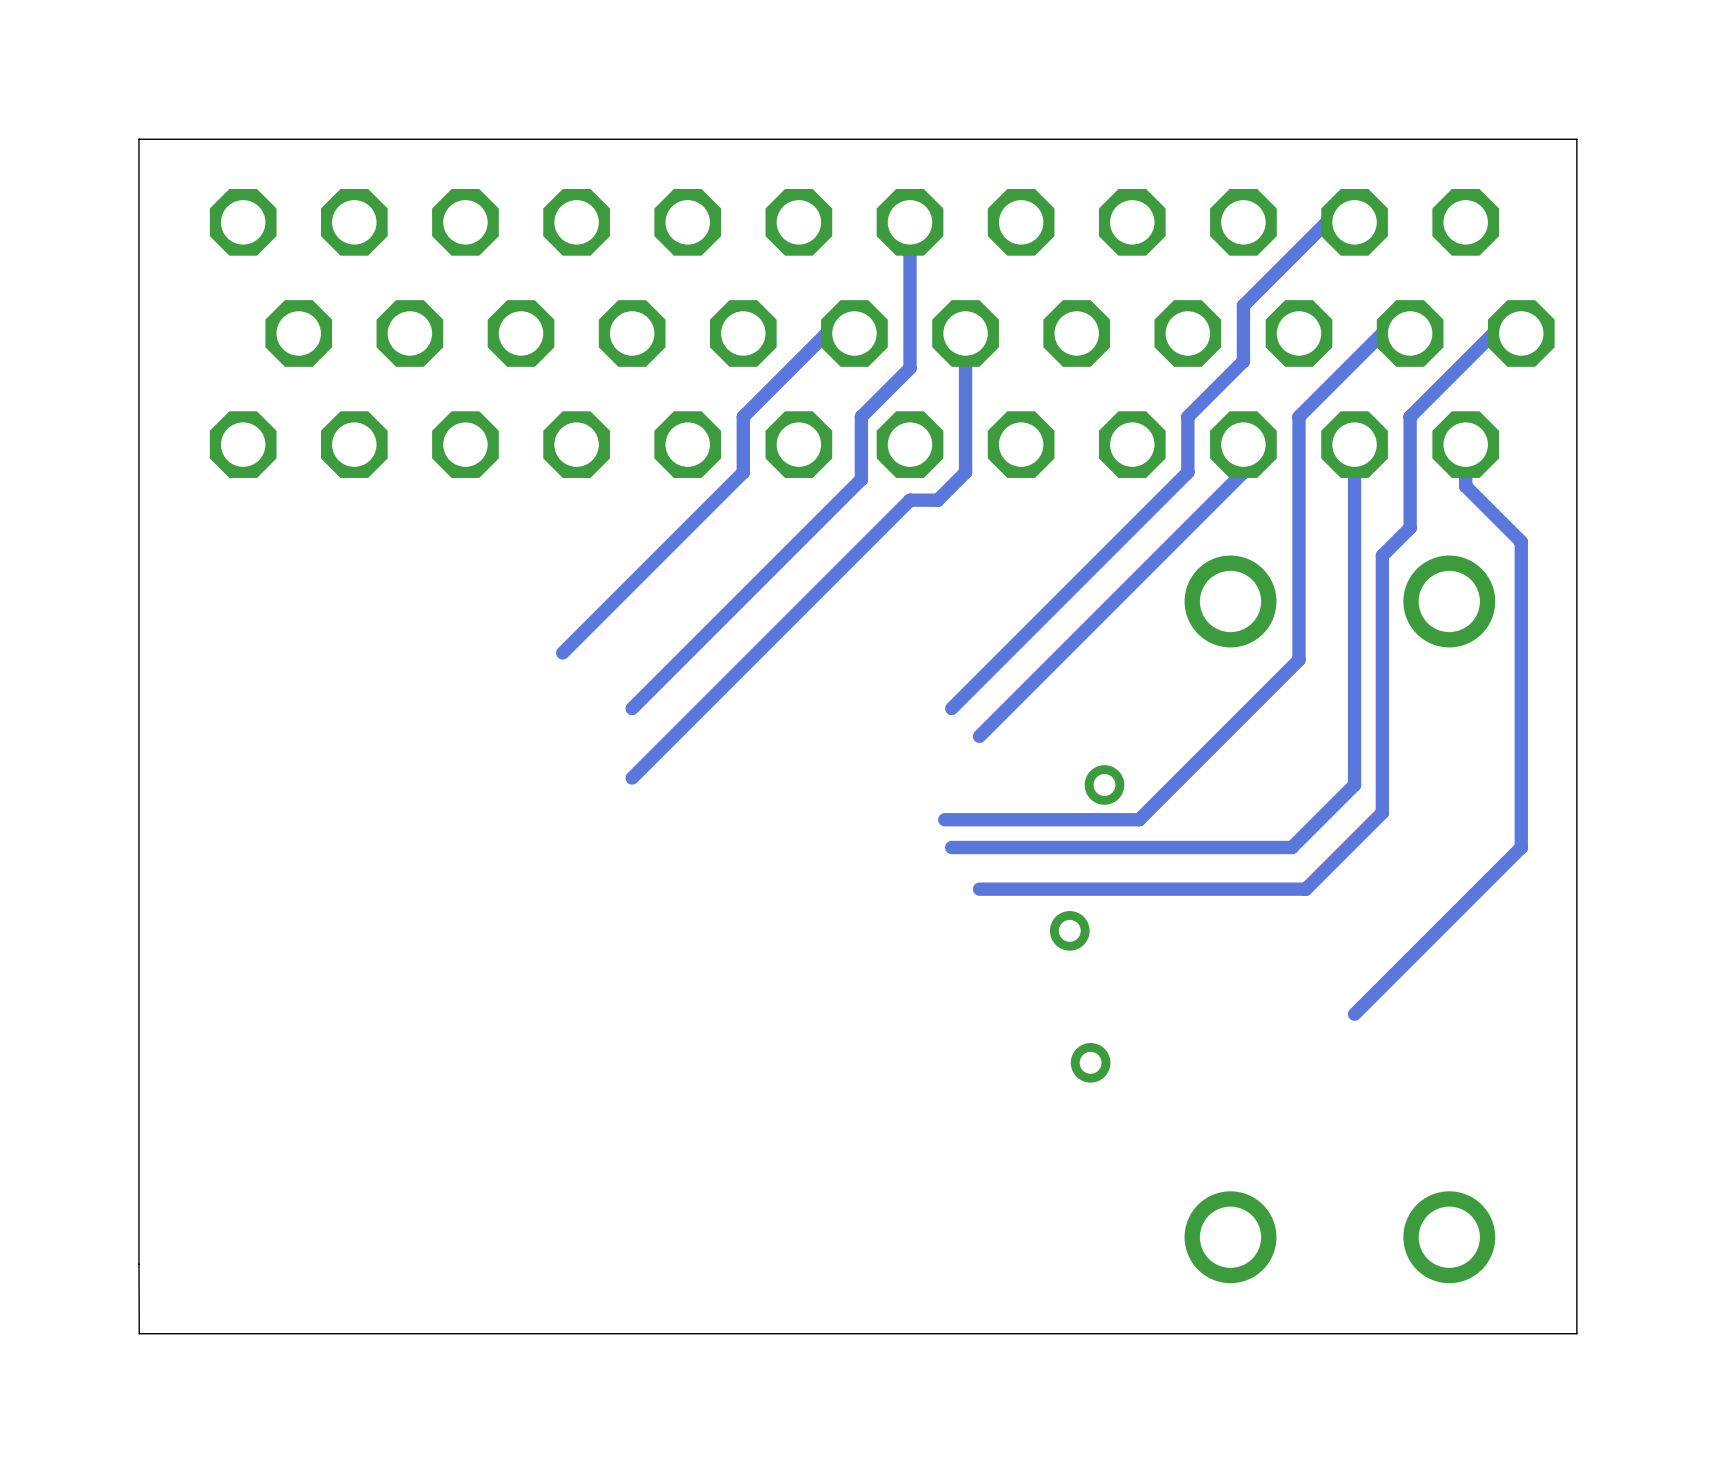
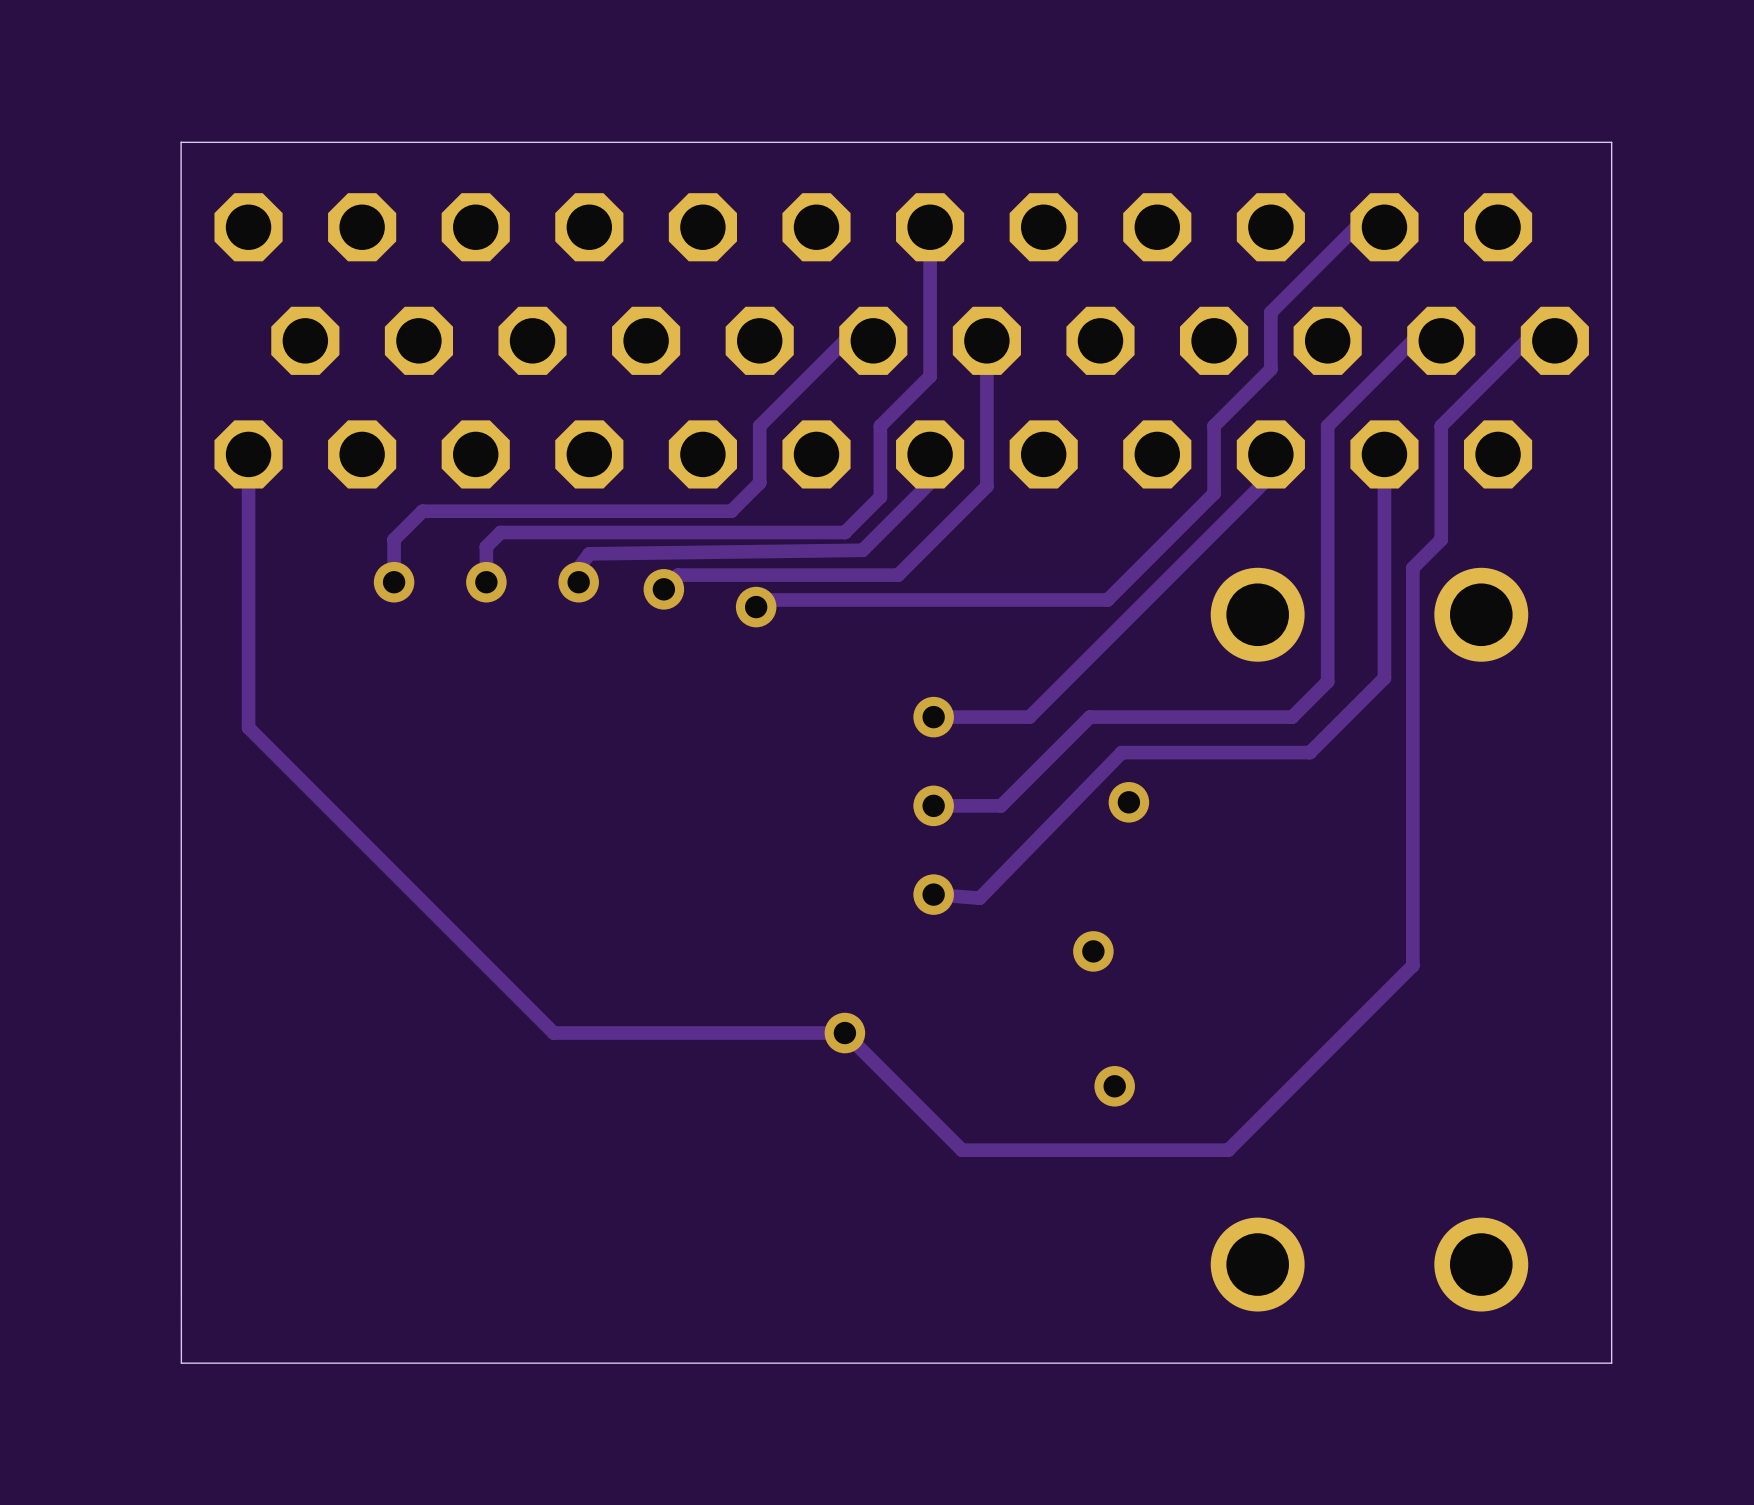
board edge: (138, 138) (139, 1333) (177, 1333) -> (181, 142) (181, 1363)
board edge: (177, 139) (139, 139) -> none
track: none -> (930, 454) (930, 482) (862, 550) (589, 553) (578, 568) (578, 582)
track: (1465, 444) (1465, 486) (1521, 541) (1521, 847) (1354, 1014) -> none
track: (1243, 465) (1243, 472) (979, 736) -> (1270, 475) (1029, 717) (933, 717)
track: (965, 472) (937, 500) (910, 500) (632, 778) -> (986, 482) (986, 486) (898, 575) (678, 575) (663, 589)
track: (1187, 472) (951, 708) -> (1214, 482) (1214, 493) (1107, 599) (763, 599) (756, 607)
track: (861, 479) (632, 708) -> (880, 489) (880, 497) (844, 532) (500, 532) (486, 546) (486, 582)
track: (715, 500) (562, 653) -> (731, 511) (422, 511) (394, 539) (394, 582)
via: none -> (394, 582)
via: none -> (486, 582)
via: none -> (578, 582)
via: none -> (663, 589)
via: none -> (756, 607)
track: (1298, 659) (1139, 819) (944, 819) -> (1327, 674) (1327, 681) (1292, 717) (1089, 717) (1001, 805) (933, 805)
track: (1354, 663) (1354, 784) (1292, 847) (951, 847) -> (1384, 678) (1309, 752) (1121, 752) (979, 898) (933, 894)
via: none -> (933, 717)
via: none -> (933, 805)
track: (1382, 812) (1305, 889) (979, 889) -> (1412, 830) (1412, 965) (1228, 1150) (962, 1150) (844, 1033) (553, 1033) (248, 727) (248, 454)
via: none -> (933, 894)
via: none -> (844, 1033)

